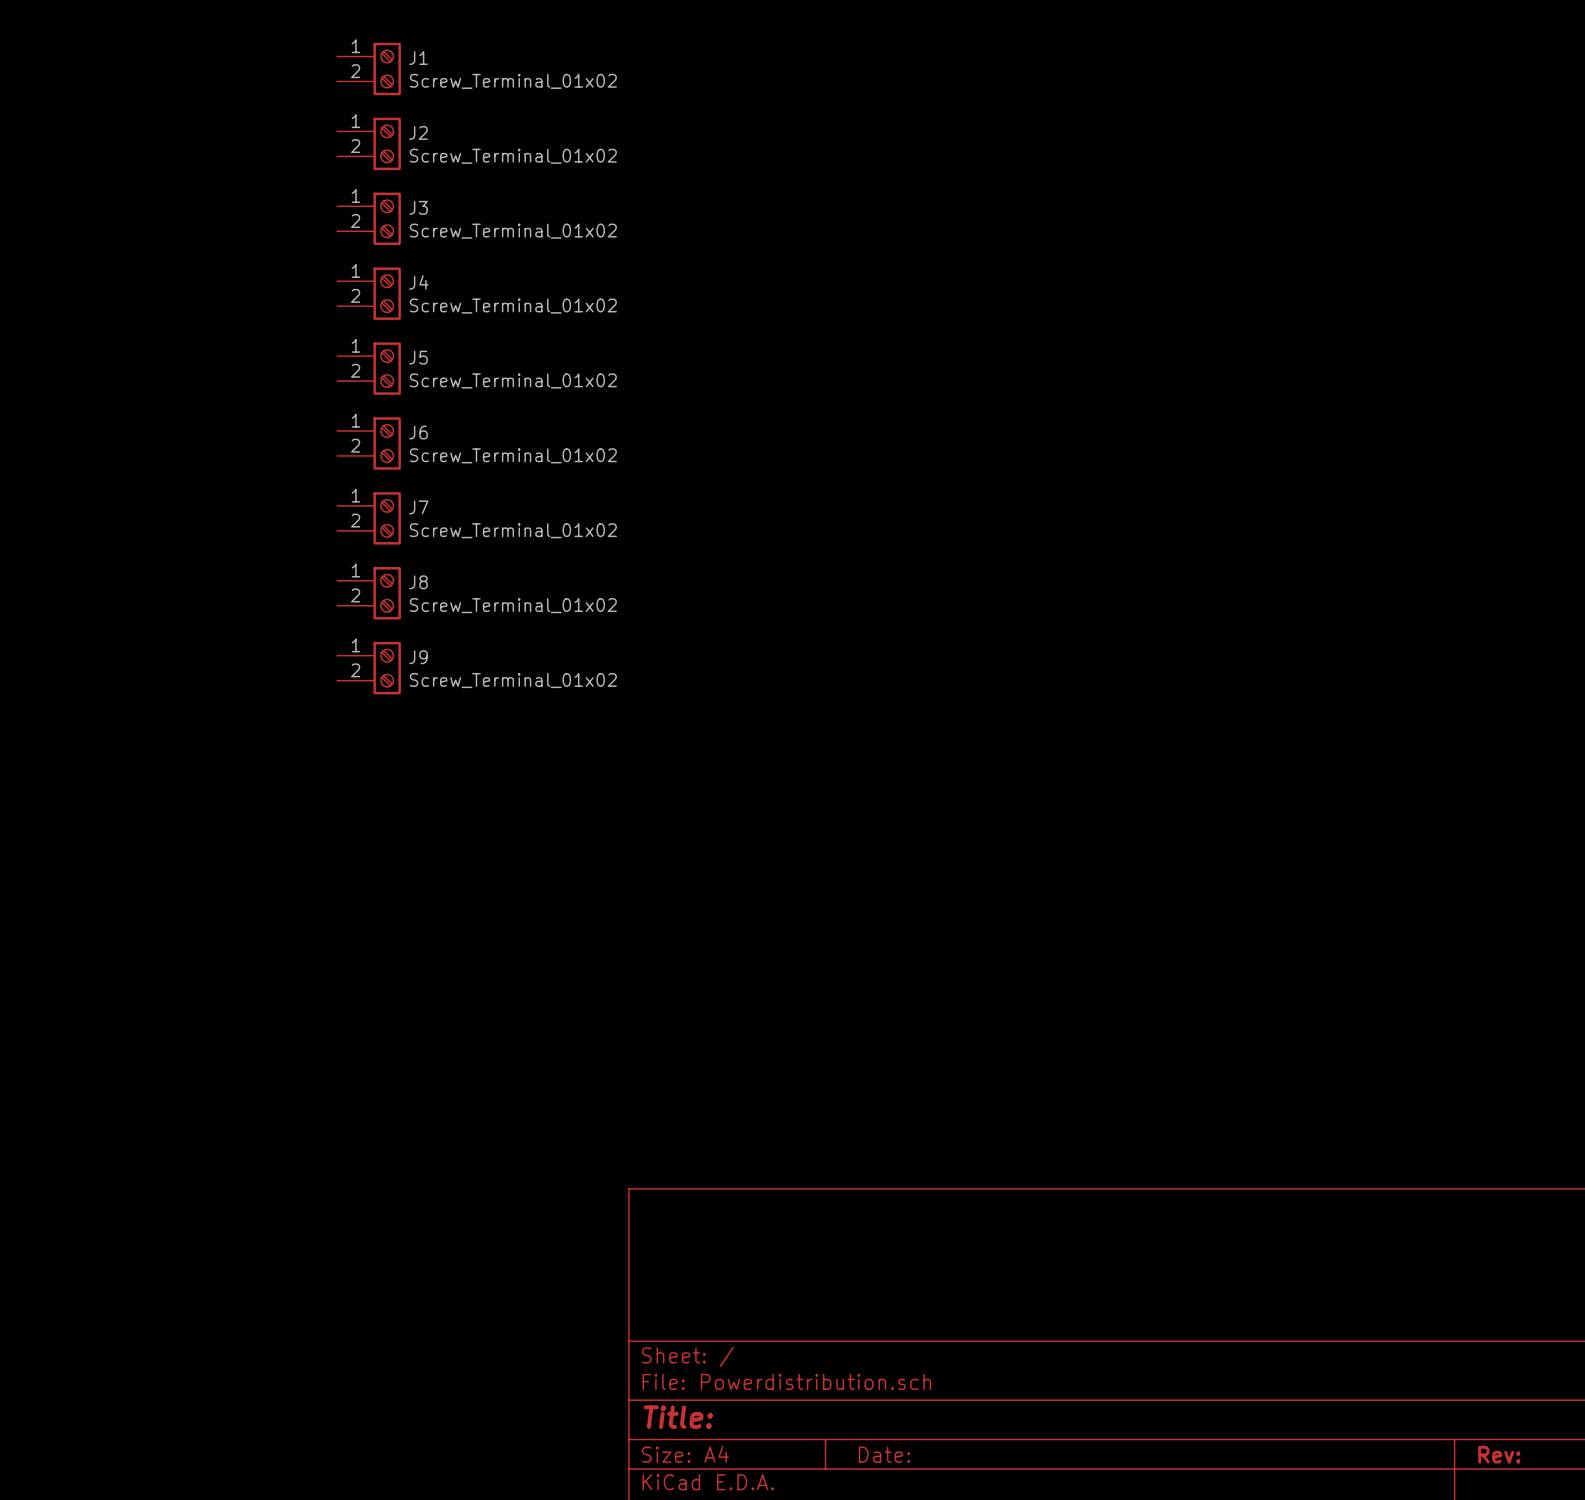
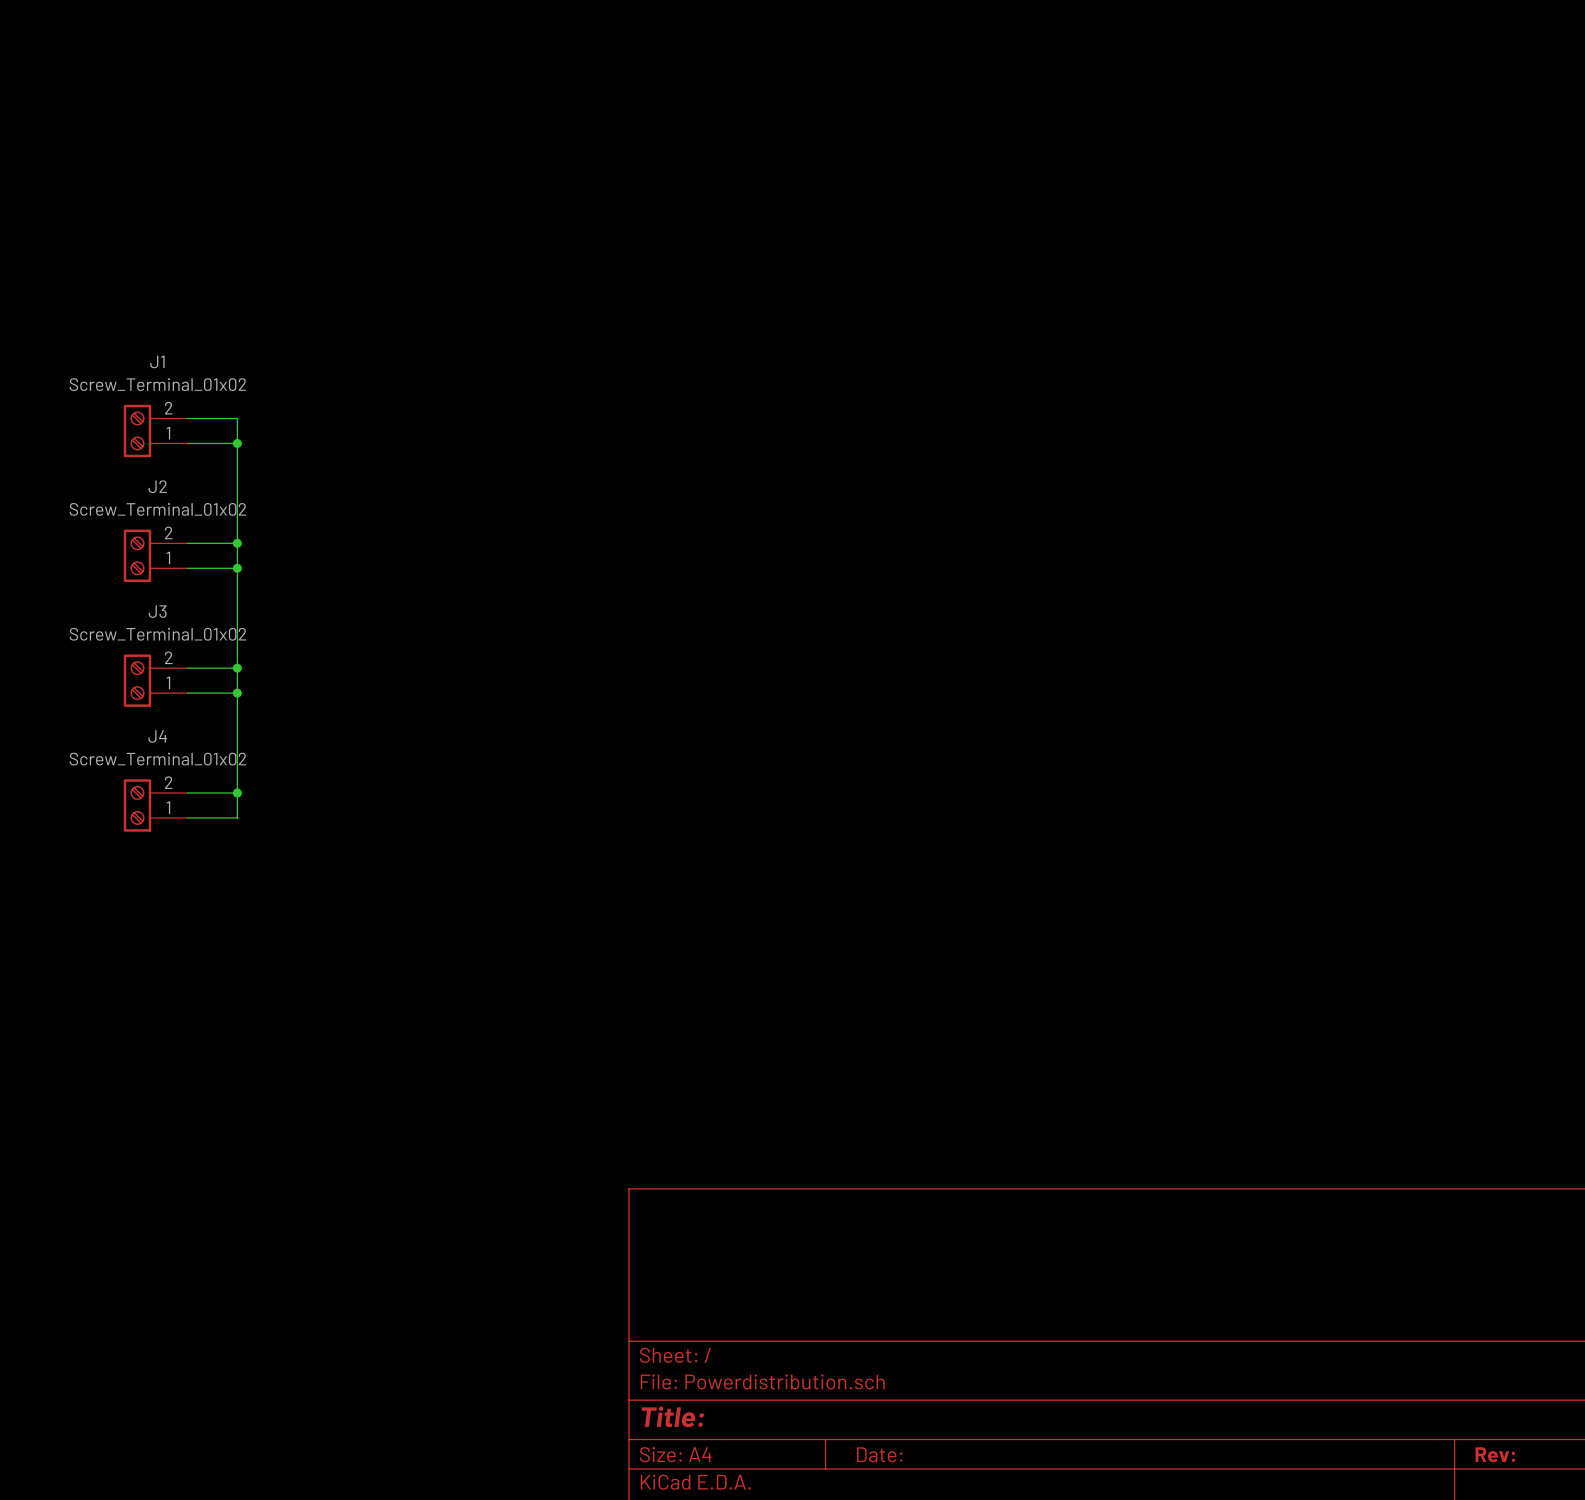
J1 name position: J1 (418, 58) -> J1 (157, 361)
J1 position: (369, 69) -> (155, 430)
J1 rotation: 0° (387, 69) -> 180° (137, 430)
J1 value position: Screw_Terminal_01x02 (513, 81) -> Screw_Terminal_01x02 (157, 384)
J2 name position: J2 (418, 132) -> J2 (157, 486)
J2 position: (369, 143) -> (155, 555)
J2 rotation: 0° (387, 143) -> 180° (137, 555)
J2 value position: Screw_Terminal_01x02 (513, 156) -> Screw_Terminal_01x02 (157, 509)
J3 name position: J3 (418, 207) -> J3 (157, 611)
J3 position: (369, 218) -> (155, 680)
J3 rotation: 0° (387, 218) -> 180° (137, 680)
J3 value position: Screw_Terminal_01x02 (513, 231) -> Screw_Terminal_01x02 (157, 634)
J4 name position: J4 (418, 282) -> J4 (157, 736)
J4 position: (369, 293) -> (155, 805)
J4 rotation: 0° (387, 293) -> 180° (137, 805)
J4 value position: Screw_Terminal_01x02 (513, 306) -> Screw_Terminal_01x02 (157, 759)
J5: Screw_Terminal_01x02 (369, 368) -> none
wire: none -> (187, 418) (237, 418) (237, 817) (187, 817)
wire: none -> (187, 443) (237, 443)
junction: none -> (237, 443)
J6: Screw_Terminal_01x02 (369, 443) -> none
J7: Screw_Terminal_01x02 (369, 518) -> none
wire: none -> (187, 543) (237, 543)
junction: none -> (237, 543)
wire: none -> (187, 568) (237, 568)
junction: none -> (237, 568)
J8: Screw_Terminal_01x02 (369, 593) -> none
wire: none -> (187, 668) (237, 668)
junction: none -> (237, 668)
J9: Screw_Terminal_01x02 (369, 668) -> none
wire: none -> (187, 693) (237, 693)
junction: none -> (237, 693)
wire: none -> (187, 792) (237, 792)
junction: none -> (237, 792)

